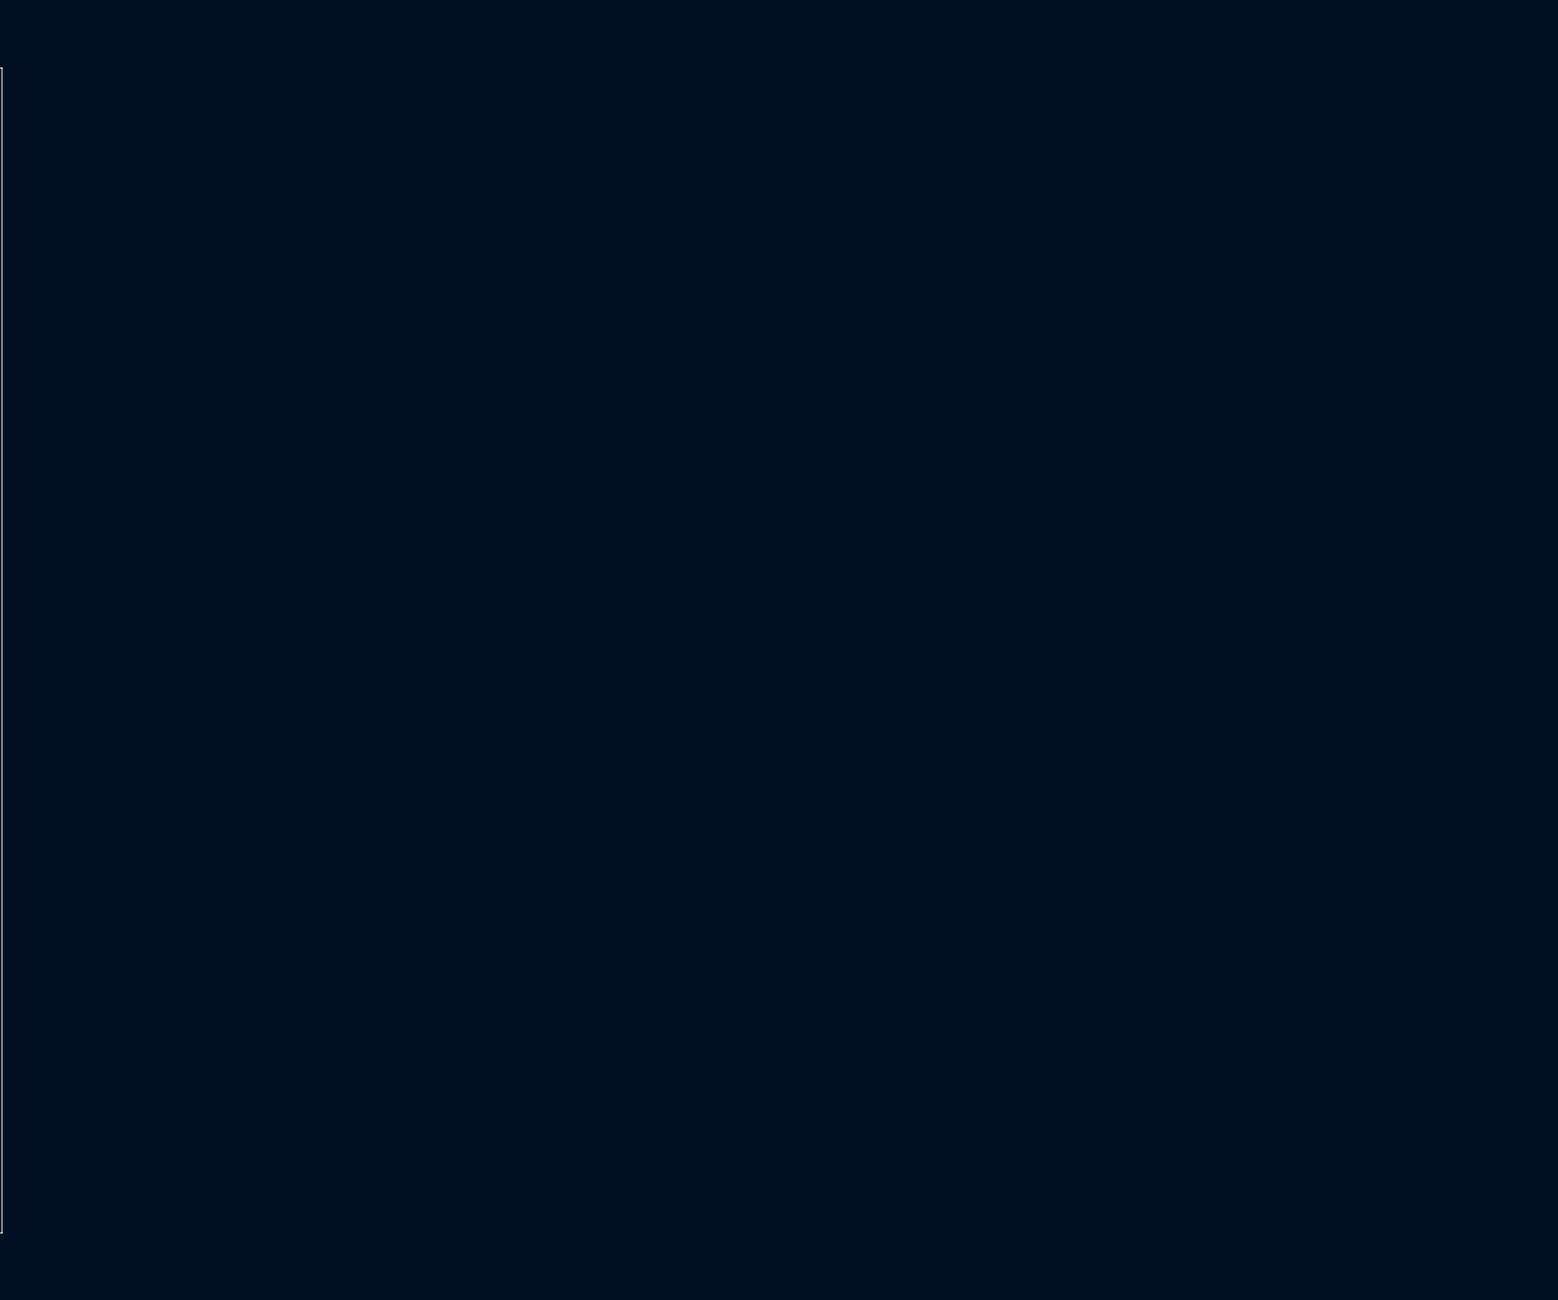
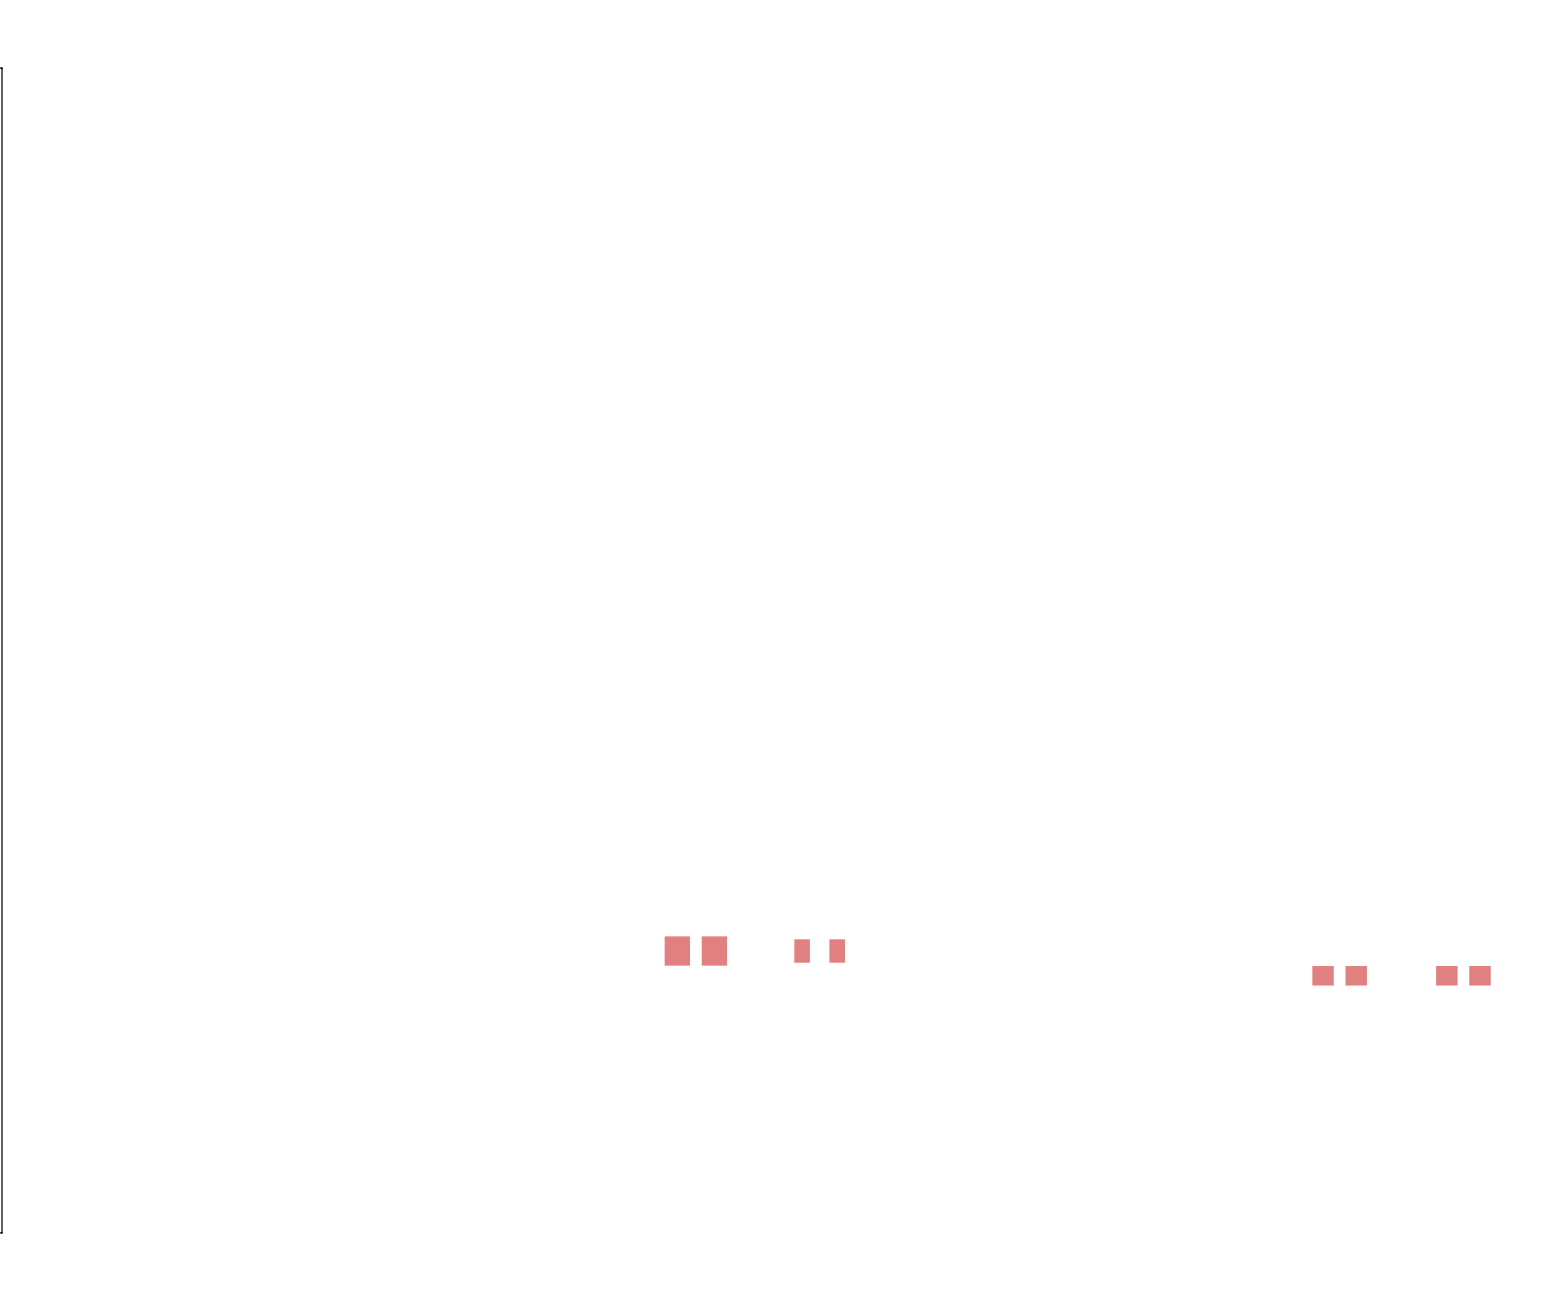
part: none -> (695, 951)
part: none -> (819, 951)
part: none -> (1339, 975)
part: none -> (1463, 975)

